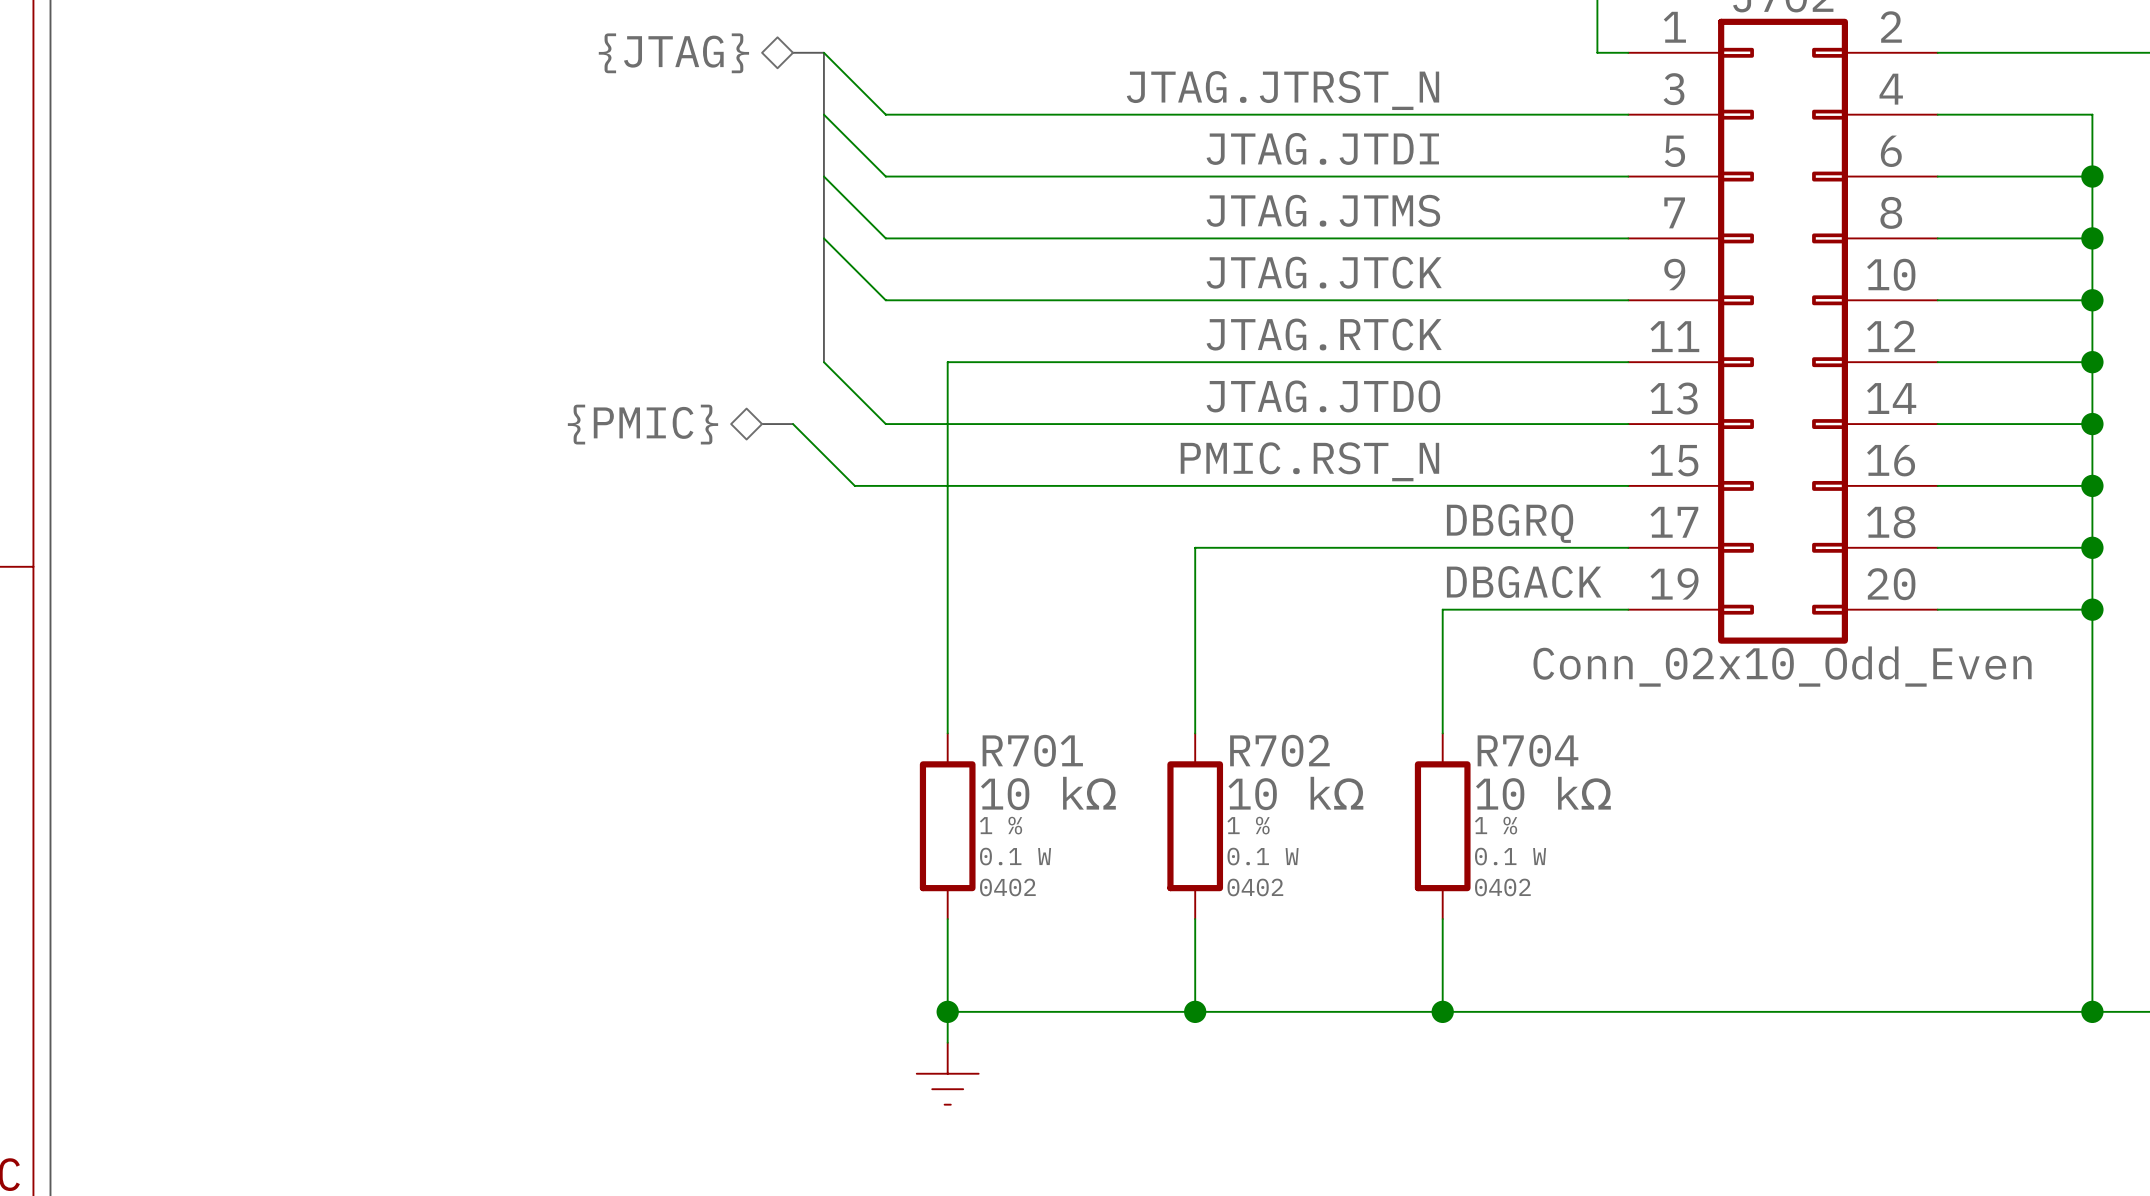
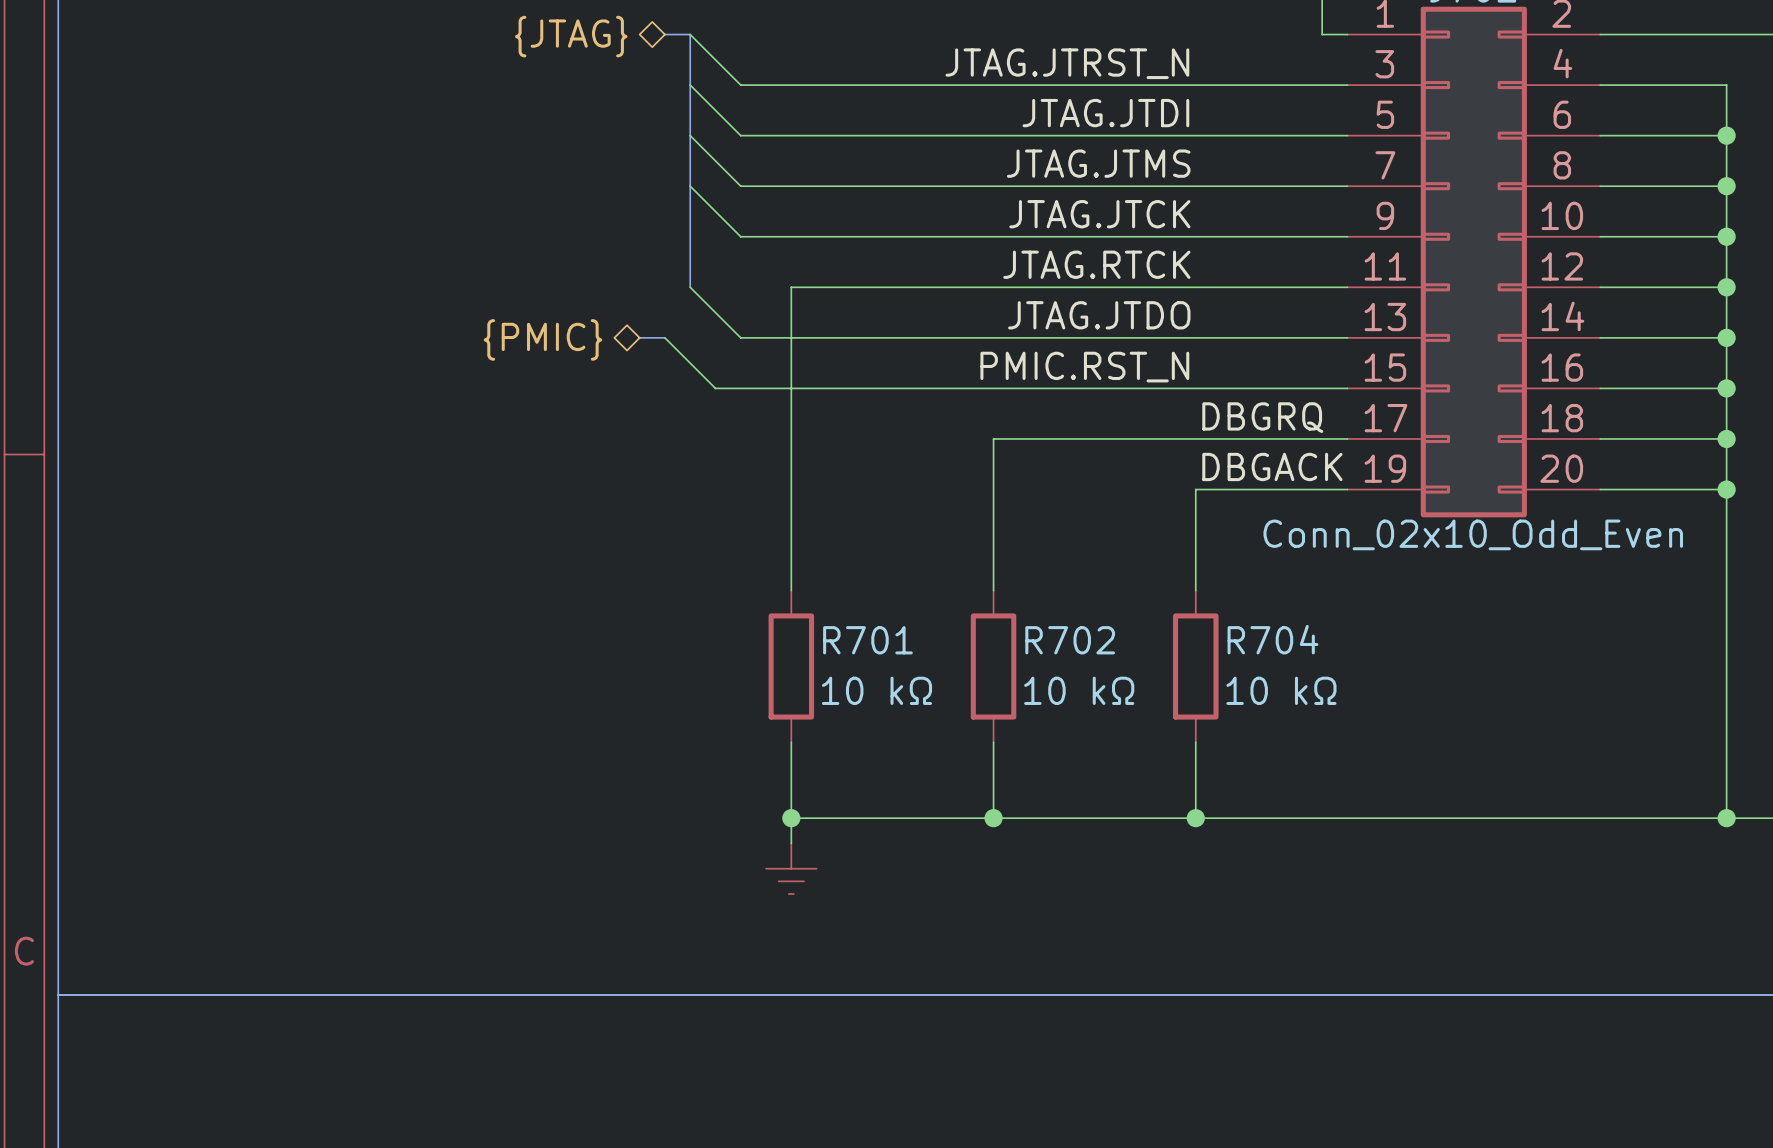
R701 name position: R701 (1032, 750) -> R701 (867, 640)
R702 name position: R702 (1279, 750) -> R702 (1070, 640)
R704 name position: R704 (1527, 750) -> R704 (1273, 639)
R701 value position: 10 kΩ (1048, 793) -> 10 kΩ (876, 690)
R702 value position: 10 kΩ (1295, 793) -> 10 kΩ (1079, 690)
R704 value position: 10 kΩ (1543, 793) -> 10 kΩ (1281, 690)
R701 text: 1 % (1001, 825) -> none
R702 text: 1 % (1248, 825) -> none
R704 text: 1 % (1496, 825) -> none
R701 text: 0.1 W (1015, 856) -> none
R702 text: 0.1 W (1263, 856) -> none
R704 text: 0.1 W (1510, 856) -> none
R701 text: 0402 (1007, 887) -> none
R702 text: 0402 (1255, 887) -> none
R704 text: 0402 (1502, 887) -> none

